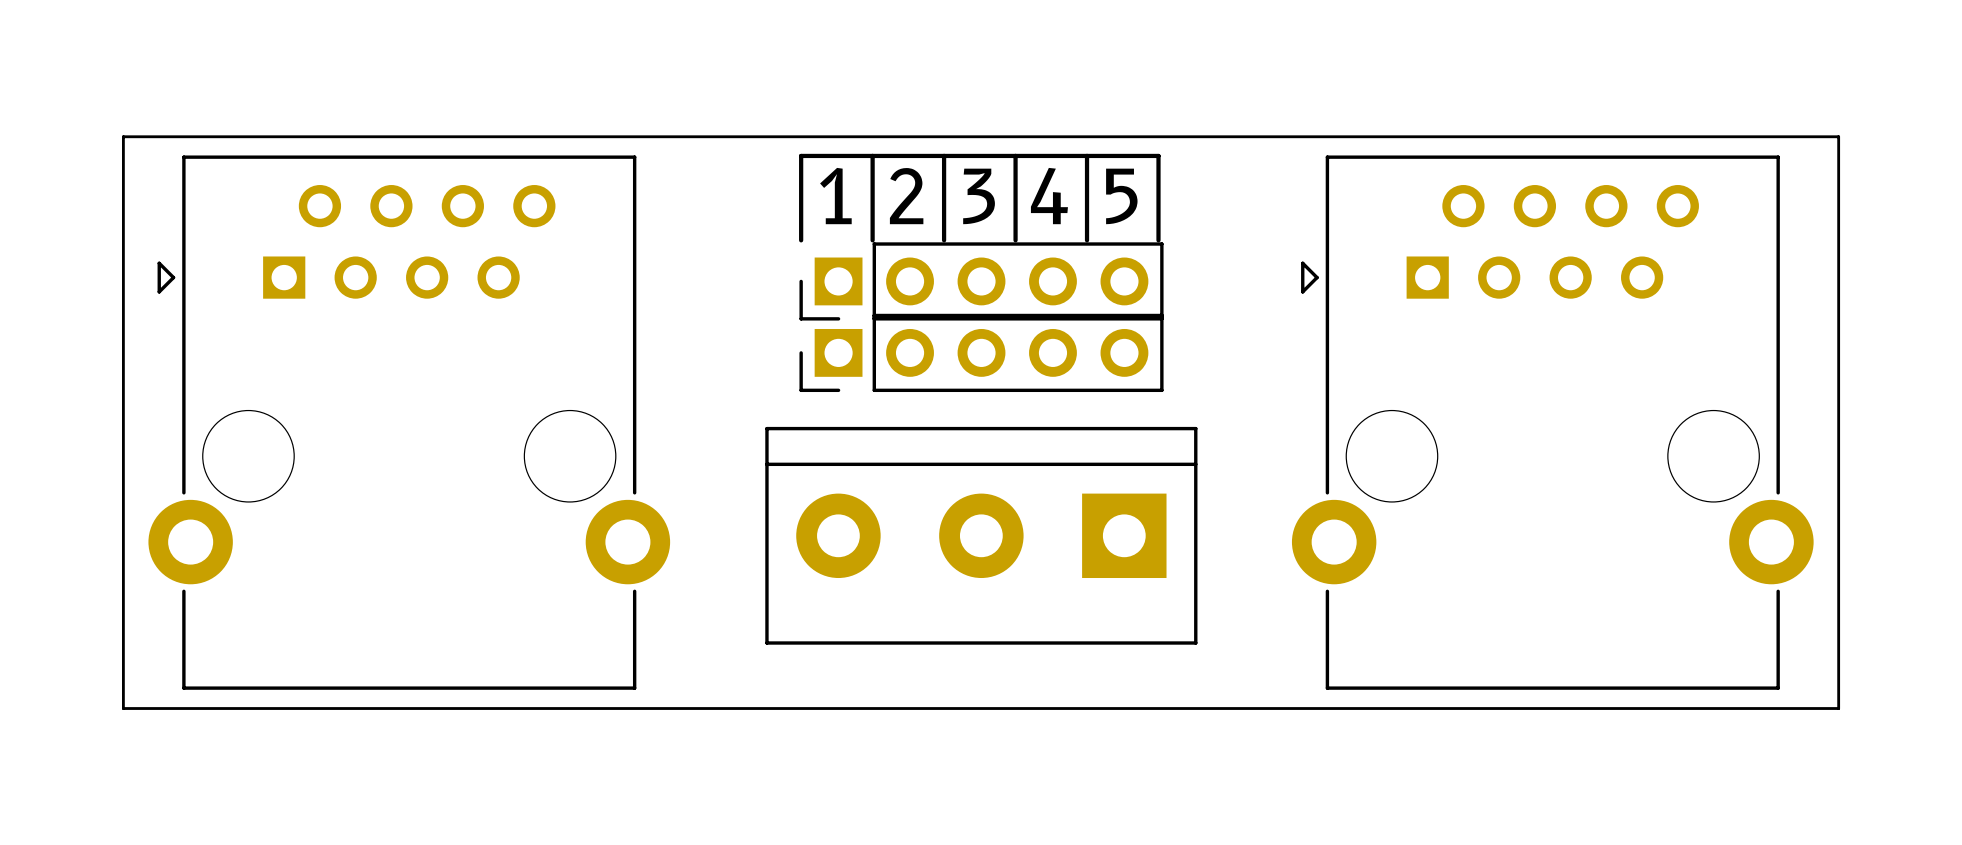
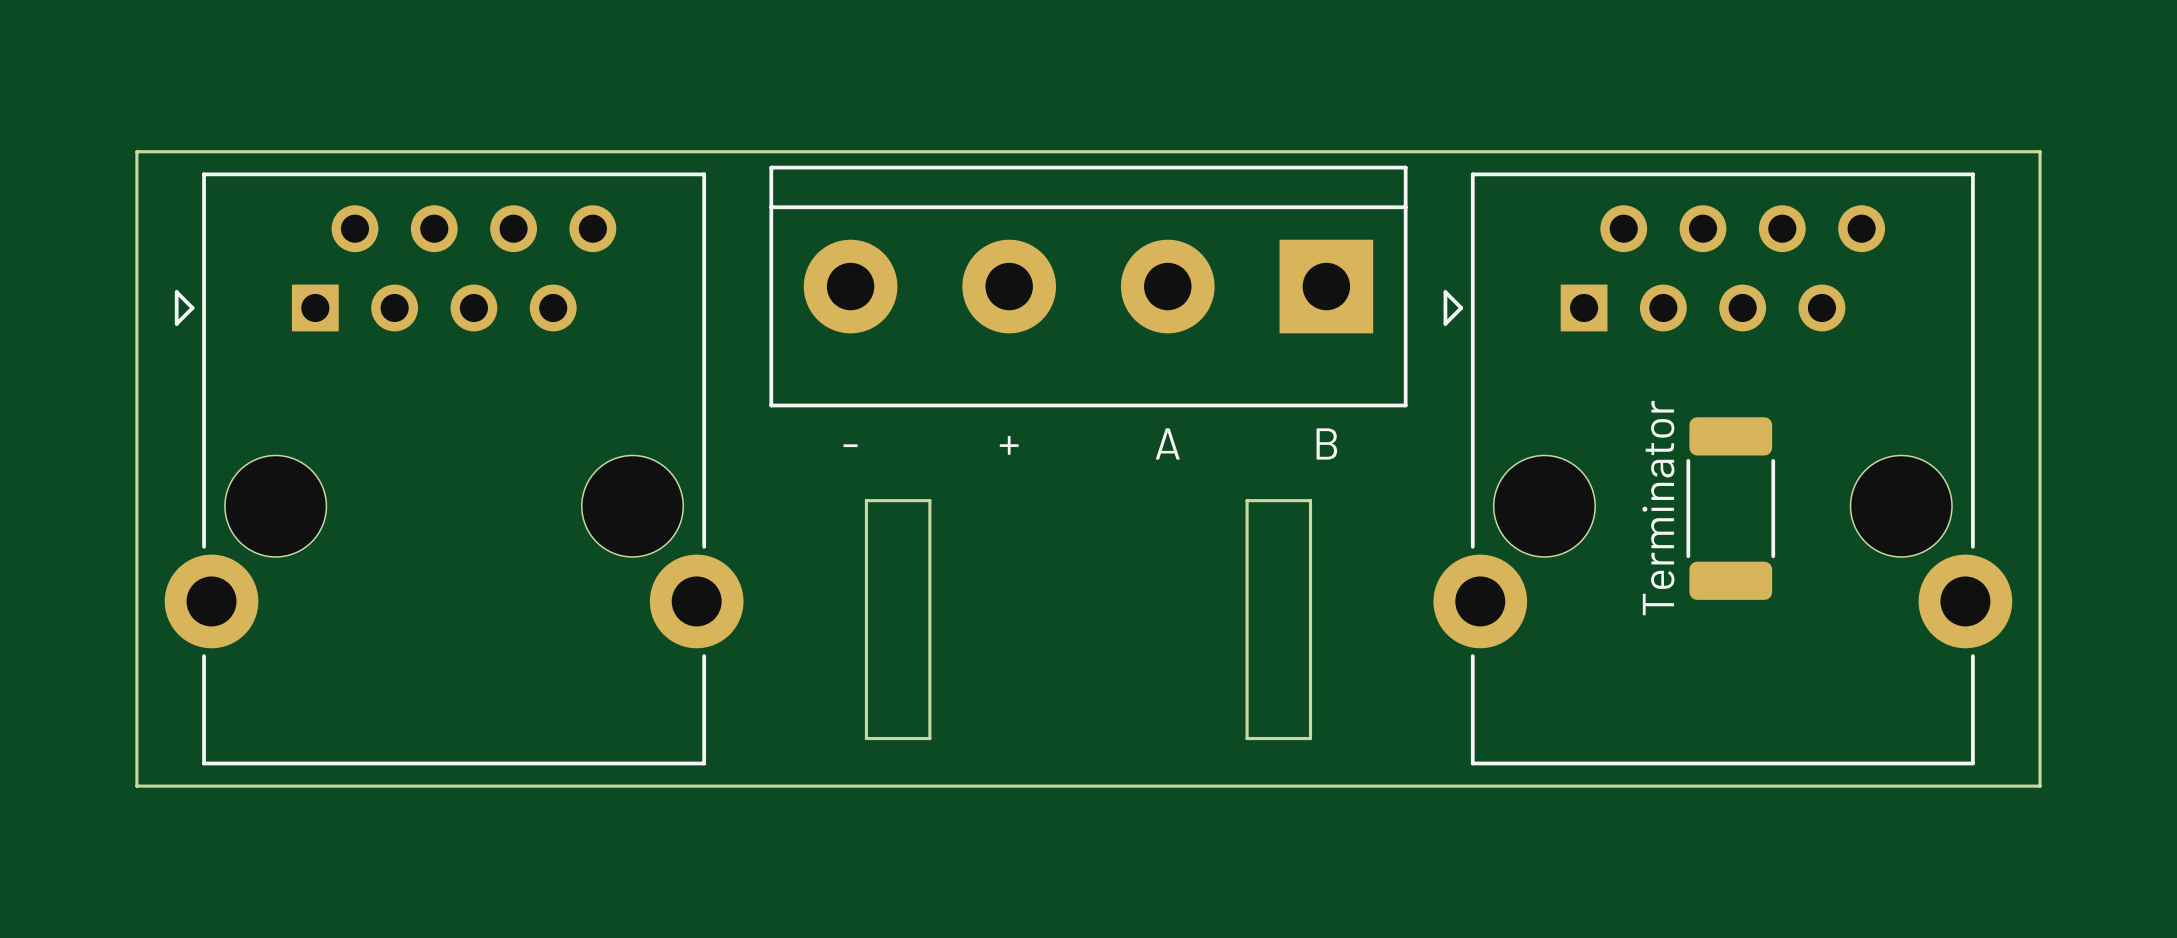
line: (872, 155) (872, 240) -> none
line: (944, 155) (944, 240) -> none
line: (1015, 155) (1015, 240) -> none
line: (1087, 155) (1087, 240) -> none
text: 1 (835, 196) -> none
text: 2 (906, 196) -> none
text: 3 (979, 196) -> none
text: 4 (1049, 196) -> none
text: 5 (1121, 196) -> none
line: (801, 240) (801, 155) (1158, 155) (1158, 240) -> none
part footprint: [799, 242, 1164, 321] -> [769, 165, 1408, 408]
part: (981, 352) -> none
text: none -> A (1167, 443)
text: none -> B (1326, 443)
text: none -> + (1009, 445)
text: none -> - (850, 445)
board edge: none -> (866, 500) (866, 738) (929, 738) (929, 500) (866, 500)
board edge: none -> (1247, 500) (1247, 738) (1310, 738) (1310, 500) (1247, 500)
Terminator: none -> (1730, 508)
part: (981, 535) -> none

